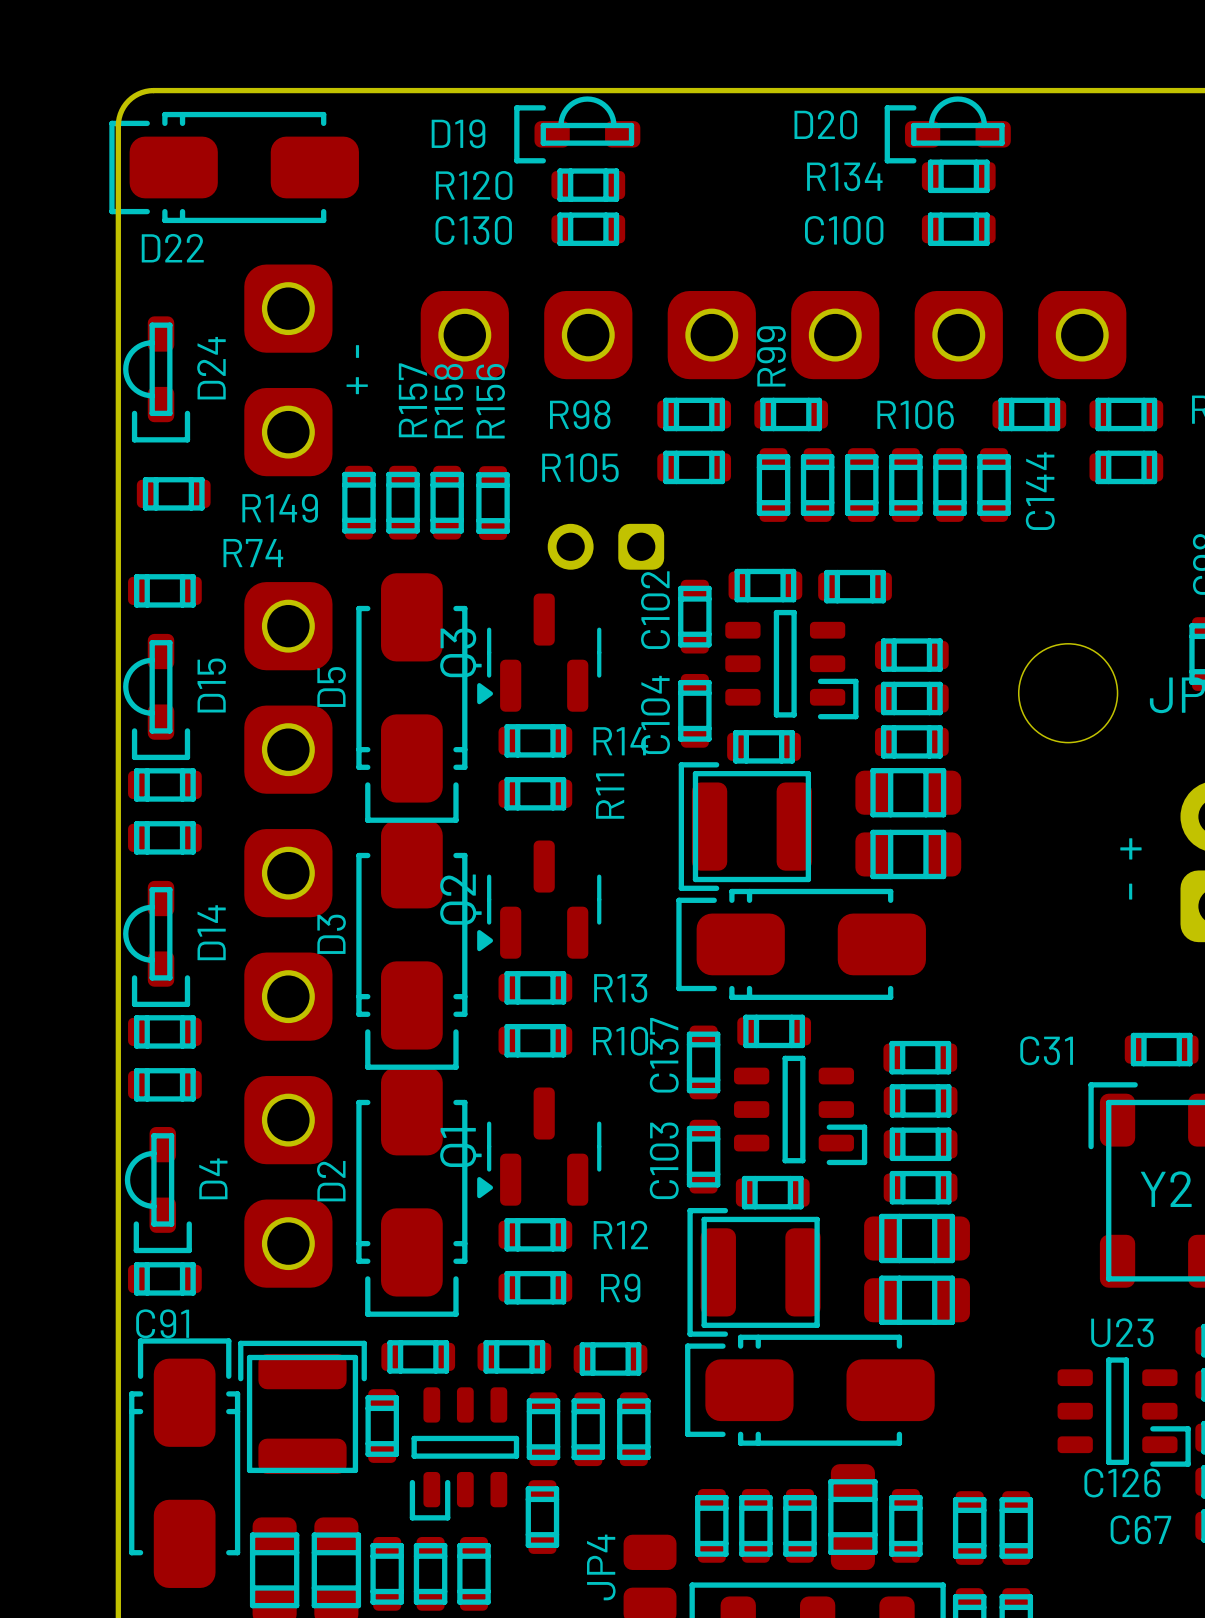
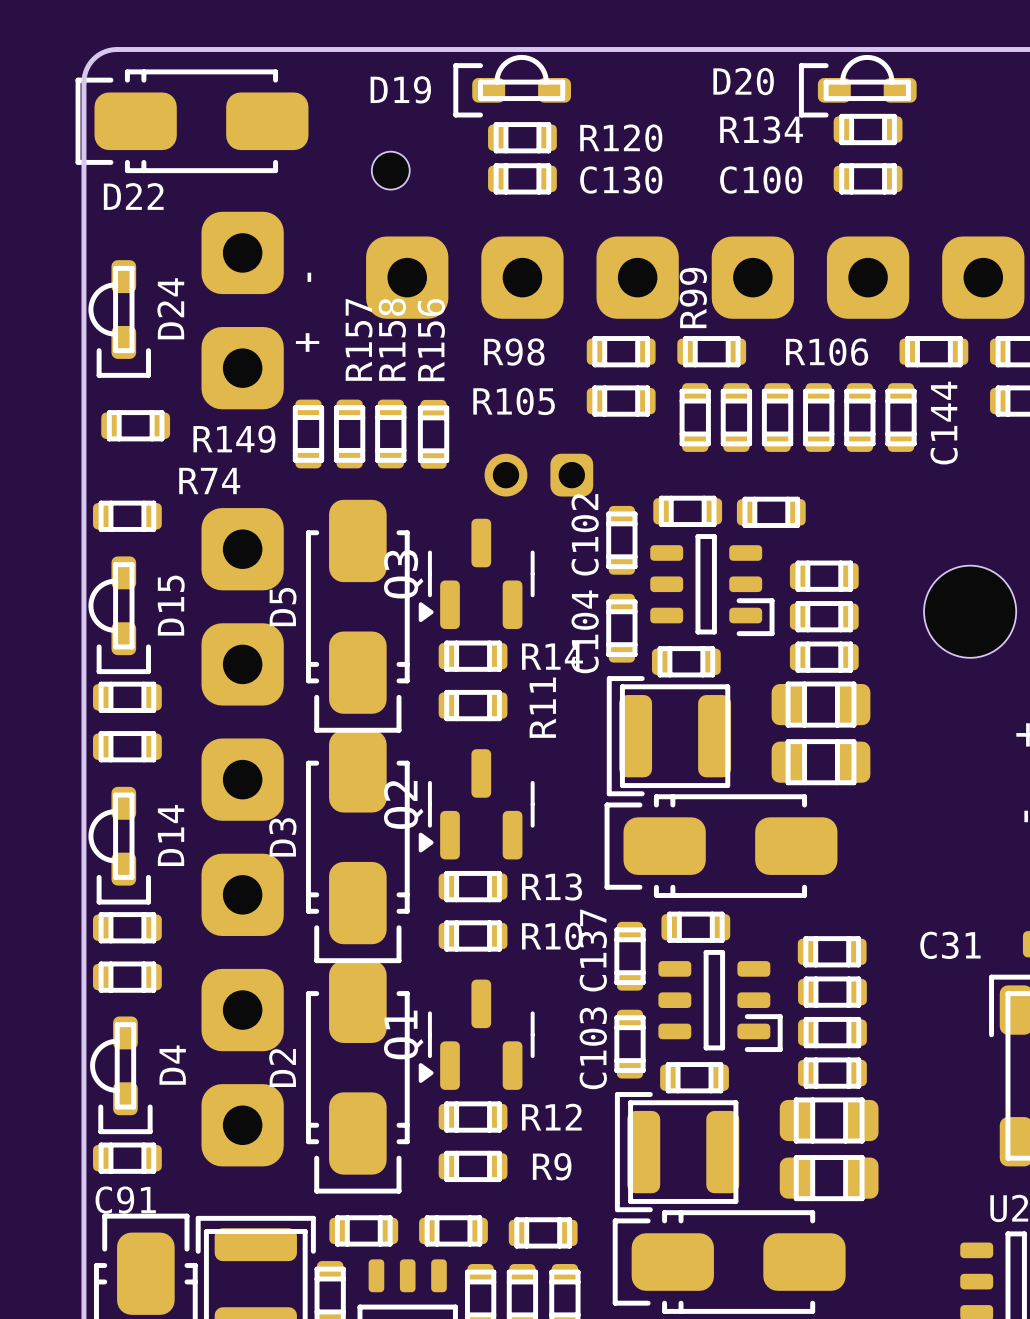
R120 name position: R120 (474, 185) -> R120 (621, 138)
part: none -> (390, 170)
C130 name position: C130 (473, 230) -> C130 (621, 180)

